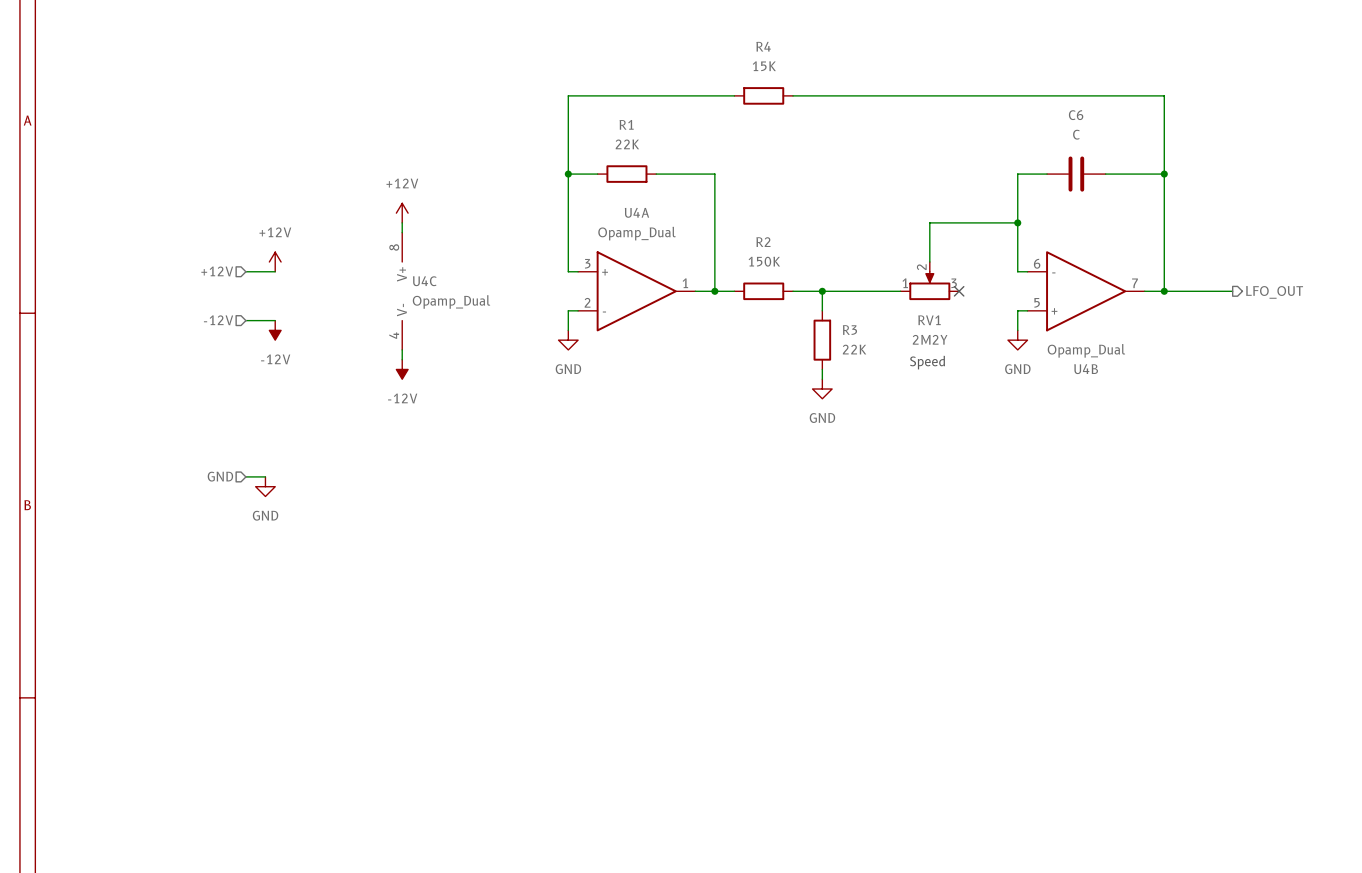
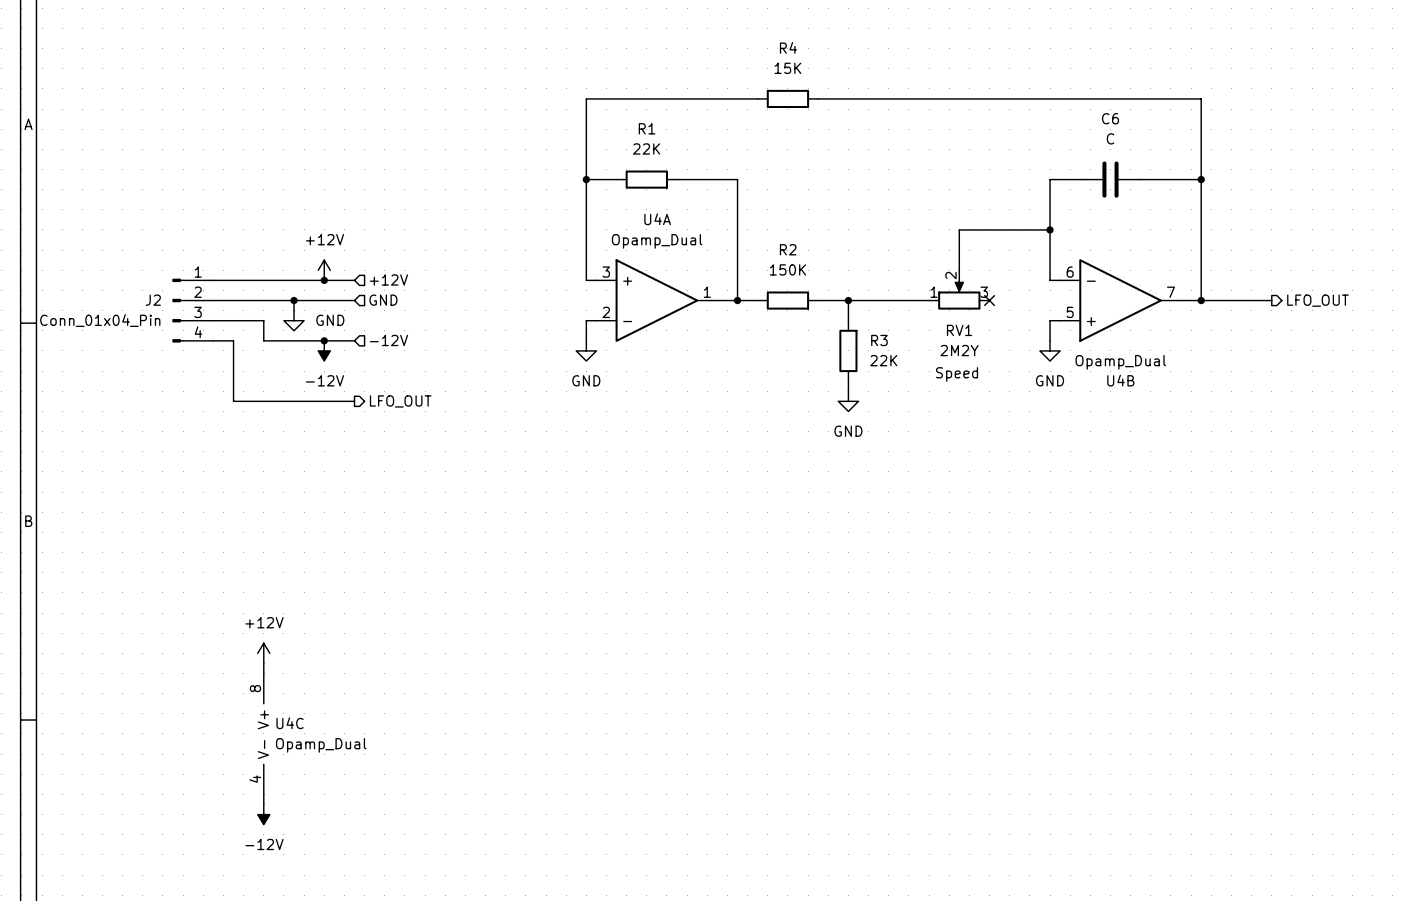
power symbol: +12V (402, 213) -> none
wire: (402, 222) (402, 232) -> none
power symbol position: +12V (275, 261) -> +12V (324, 270)
wire: none -> (213, 280) (253, 280)
hierarchical label rotation: 0° (217, 271) -> 180° (388, 280)
hierarchical label position: +12V (217, 271) -> +12V (388, 280)
wire: none -> (283, 280) (354, 280)
junction: none -> (324, 280)
hierarchical label: none -> GND (383, 300)
wire: none -> (213, 300) (354, 300)
junction: none -> (294, 300)
U4C position: (402, 291) -> (263, 733)
J2: none -> Conn_01x04_Pin (192, 310)
wire: none -> (213, 320) (263, 320) (263, 340) (354, 340)
hierarchical label rotation: 0° (218, 320) -> 180° (388, 340)
hierarchical label position: -12V (218, 320) -> -12V (388, 340)
wire: (245, 320) (275, 320) -> none
wire: none -> (213, 340) (233, 340) (233, 401) (354, 401)
power symbol position: -12V (275, 330) -> -12V (324, 350)
junction: none -> (324, 340)
wire: (402, 349) (402, 359) -> (294, 300) (294, 310)
power symbol: -12V (402, 369) -> none
hierarchical label: none -> LFO_OUT (400, 401)
hierarchical label: GND (220, 476) -> none
wire: (245, 476) (265, 476) -> none
power symbol position: GND (265, 486) -> GND (294, 320)
power symbol text position: GND (265, 515) -> GND (330, 320)
power symbol: none -> +12V (263, 653)
wire: none -> (263, 663) (263, 673)
wire: none -> (263, 794) (263, 804)
power symbol: none -> -12V (263, 814)

